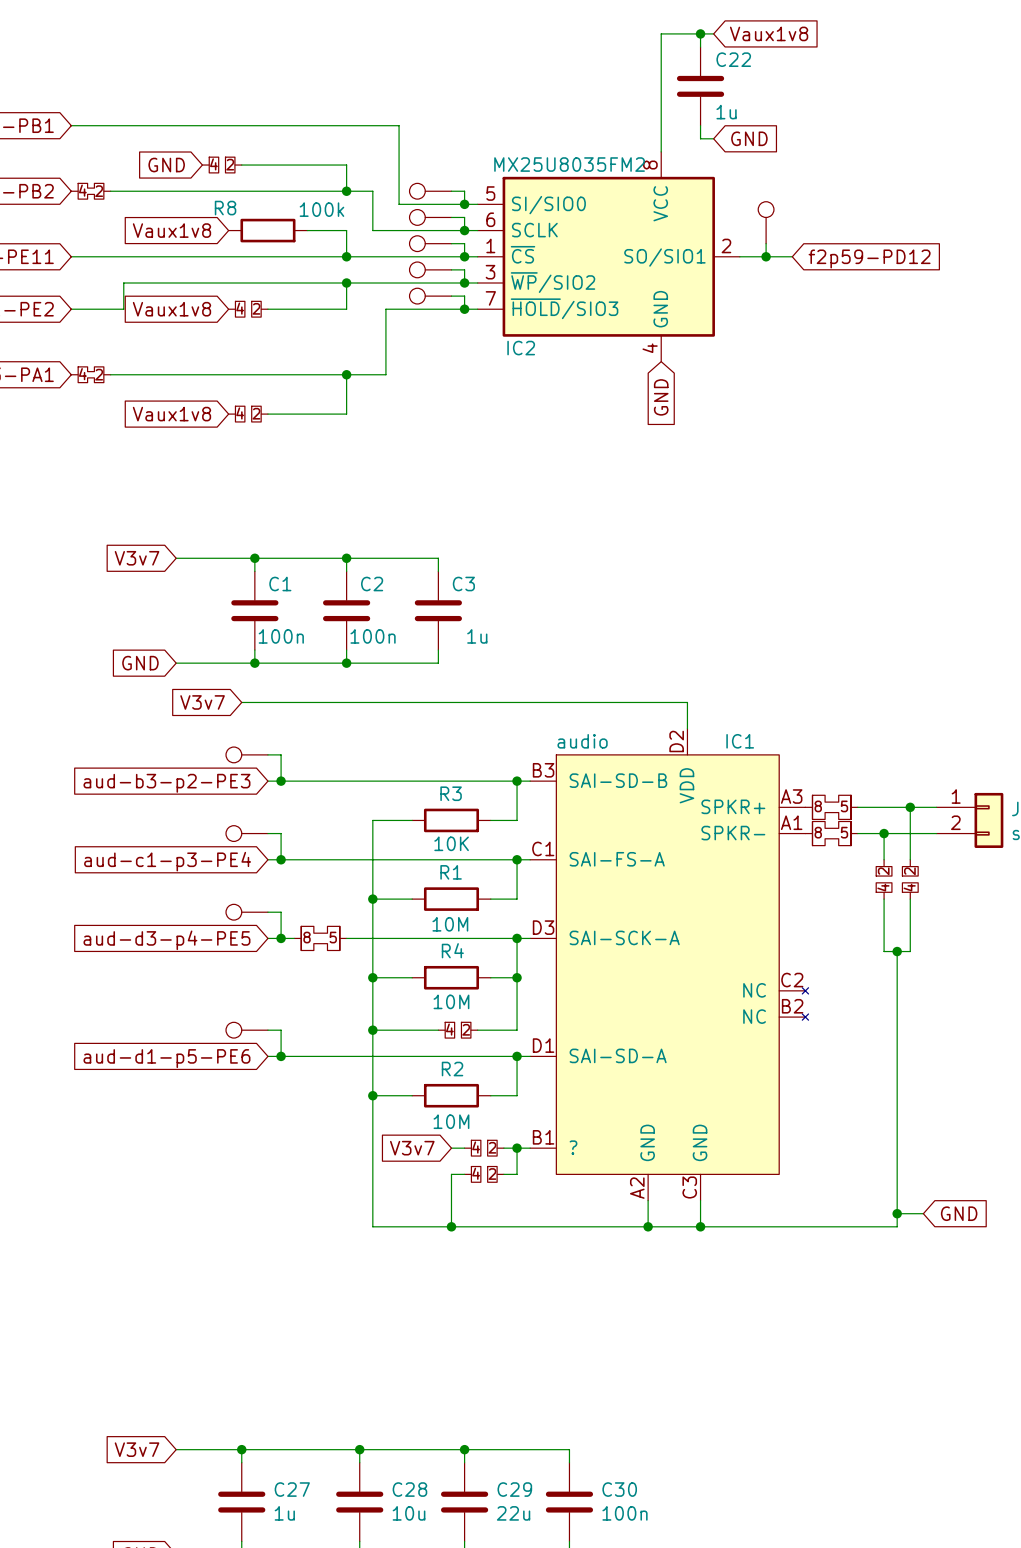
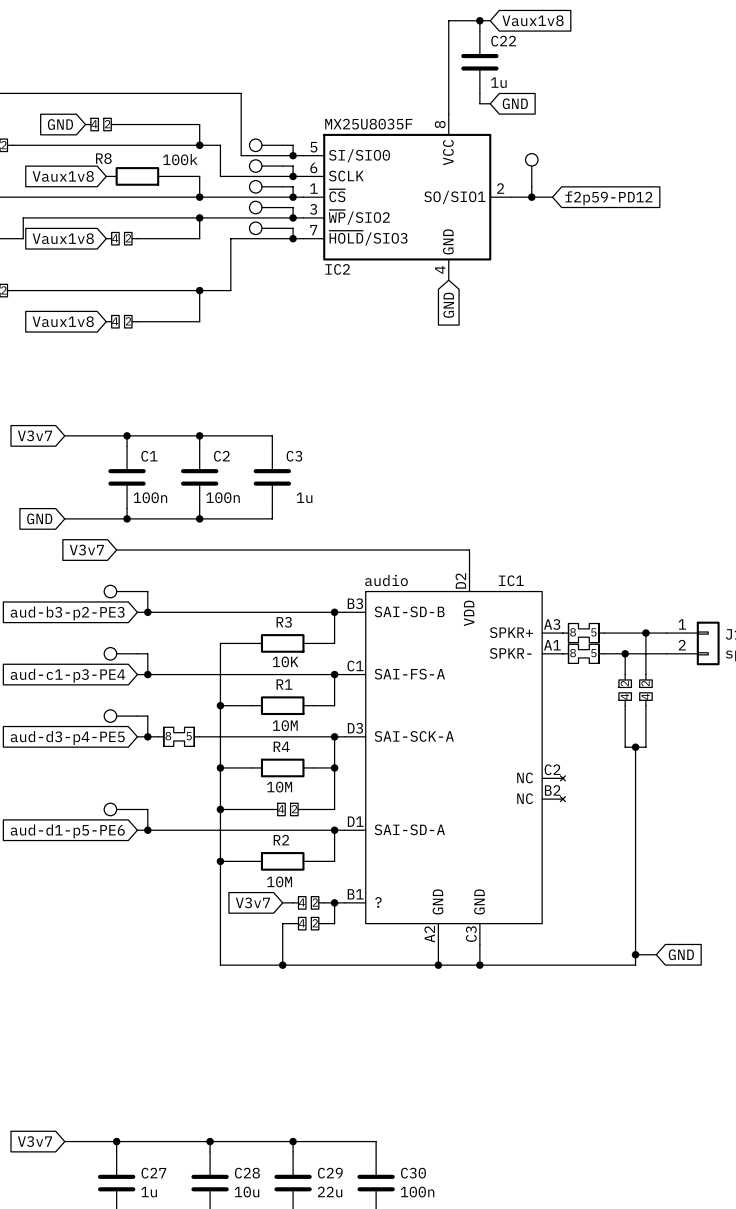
IC2 value: MX25U8035FM2 (569, 164) -> MX25U8035F (368, 124)

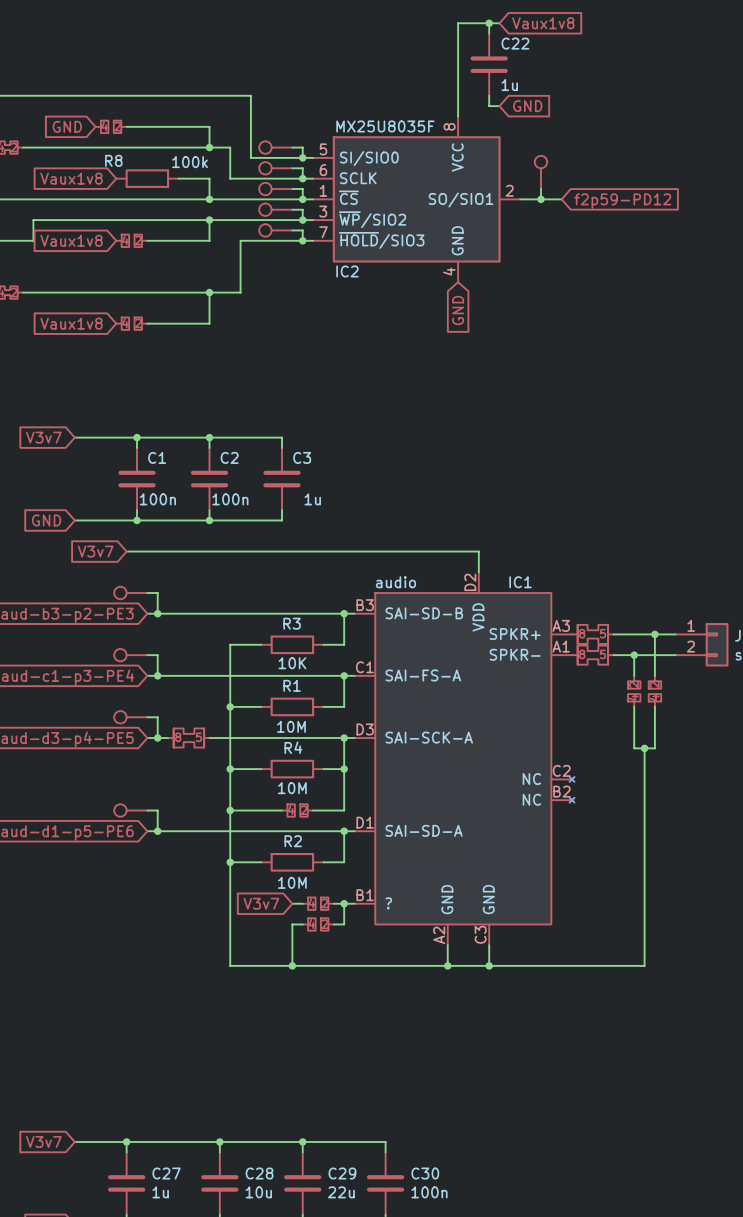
wire: (635, 954) (656, 954) -> none
junction: (635, 954) -> none
global label: GND (681, 954) -> none

